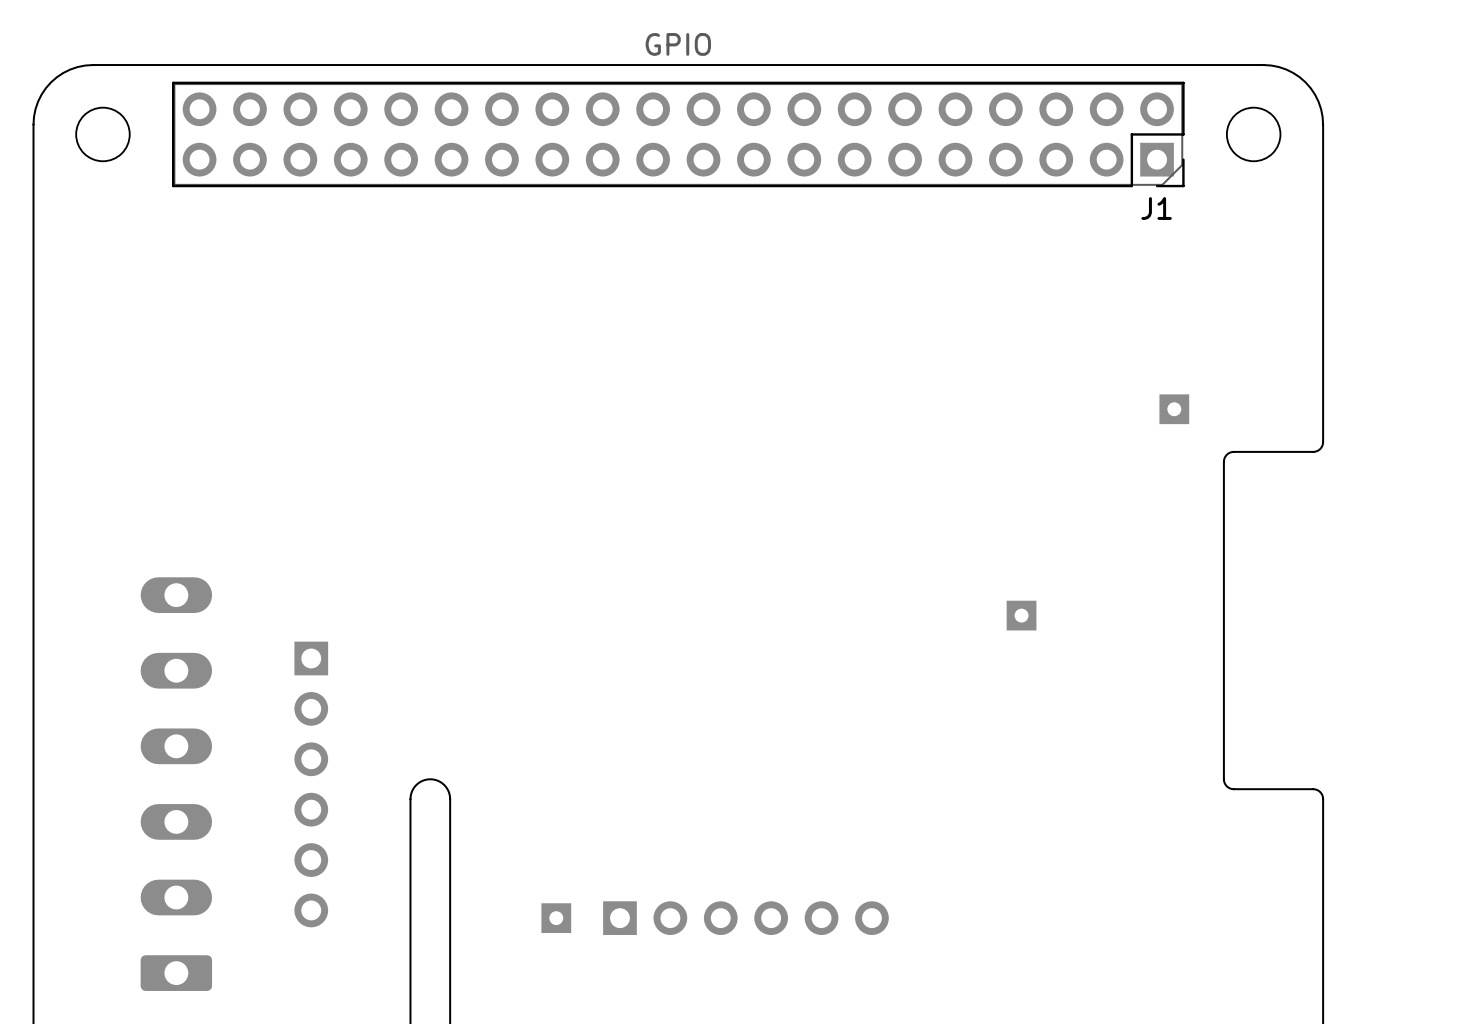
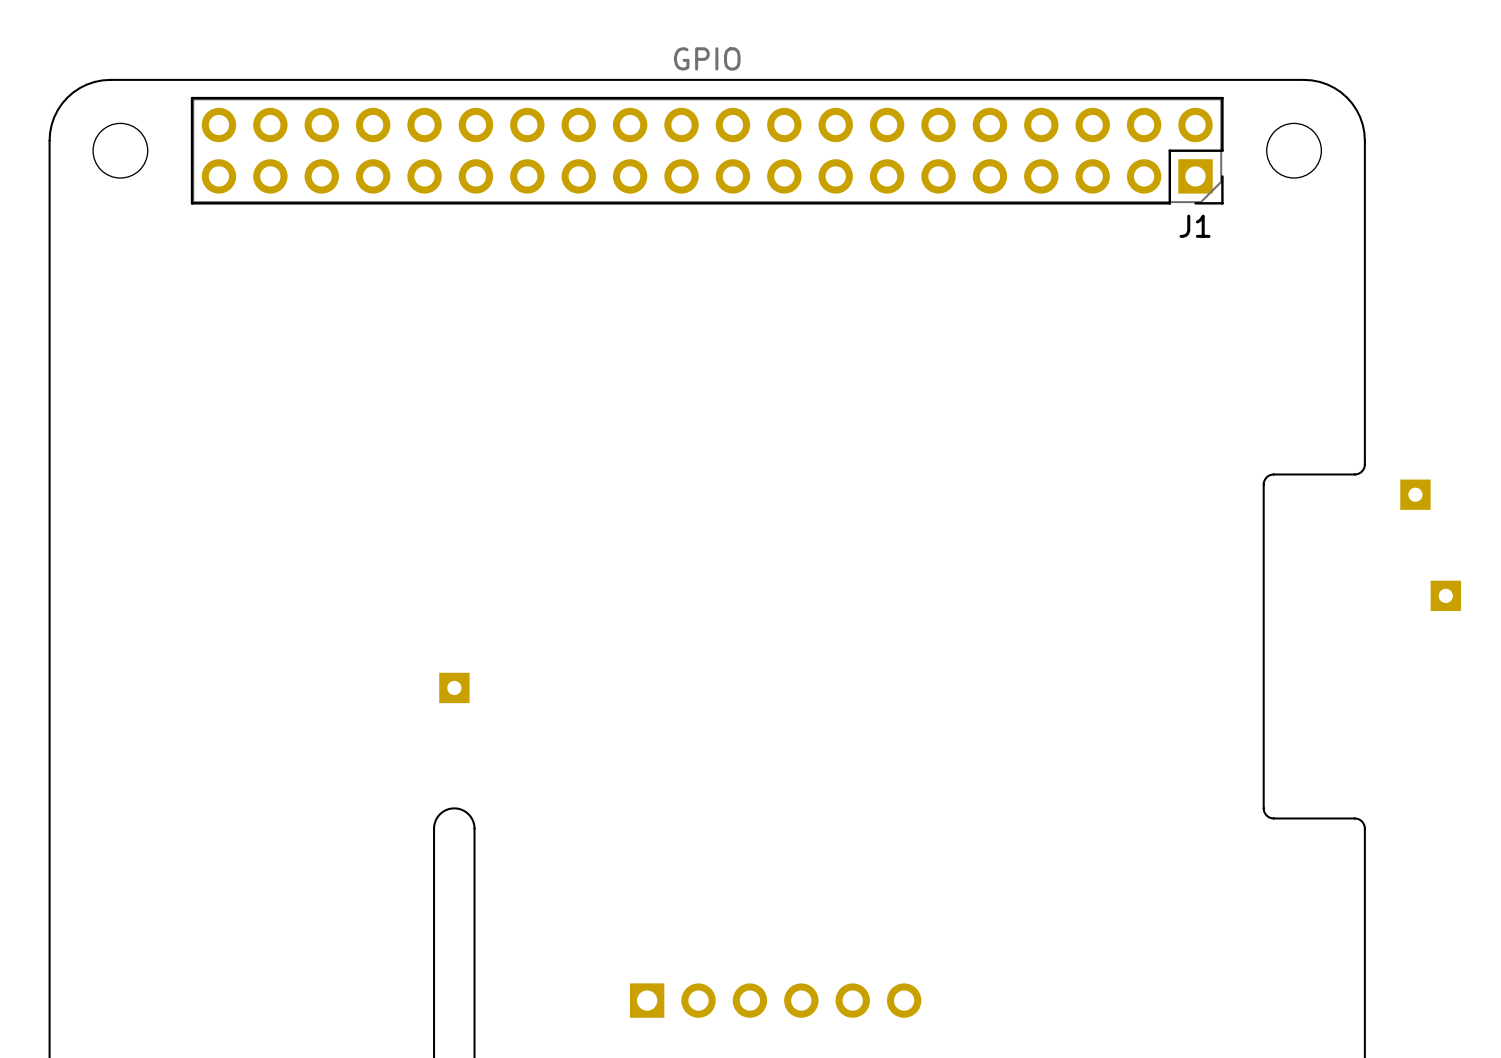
part: (1174, 409) -> none
part: none -> (1415, 494)
part: none -> (1445, 595)
part: (1021, 615) -> none
part: (176, 784) -> none
part: (311, 784) -> none
part position: (556, 918) -> (454, 687)
part position: (745, 918) -> (775, 1000)

